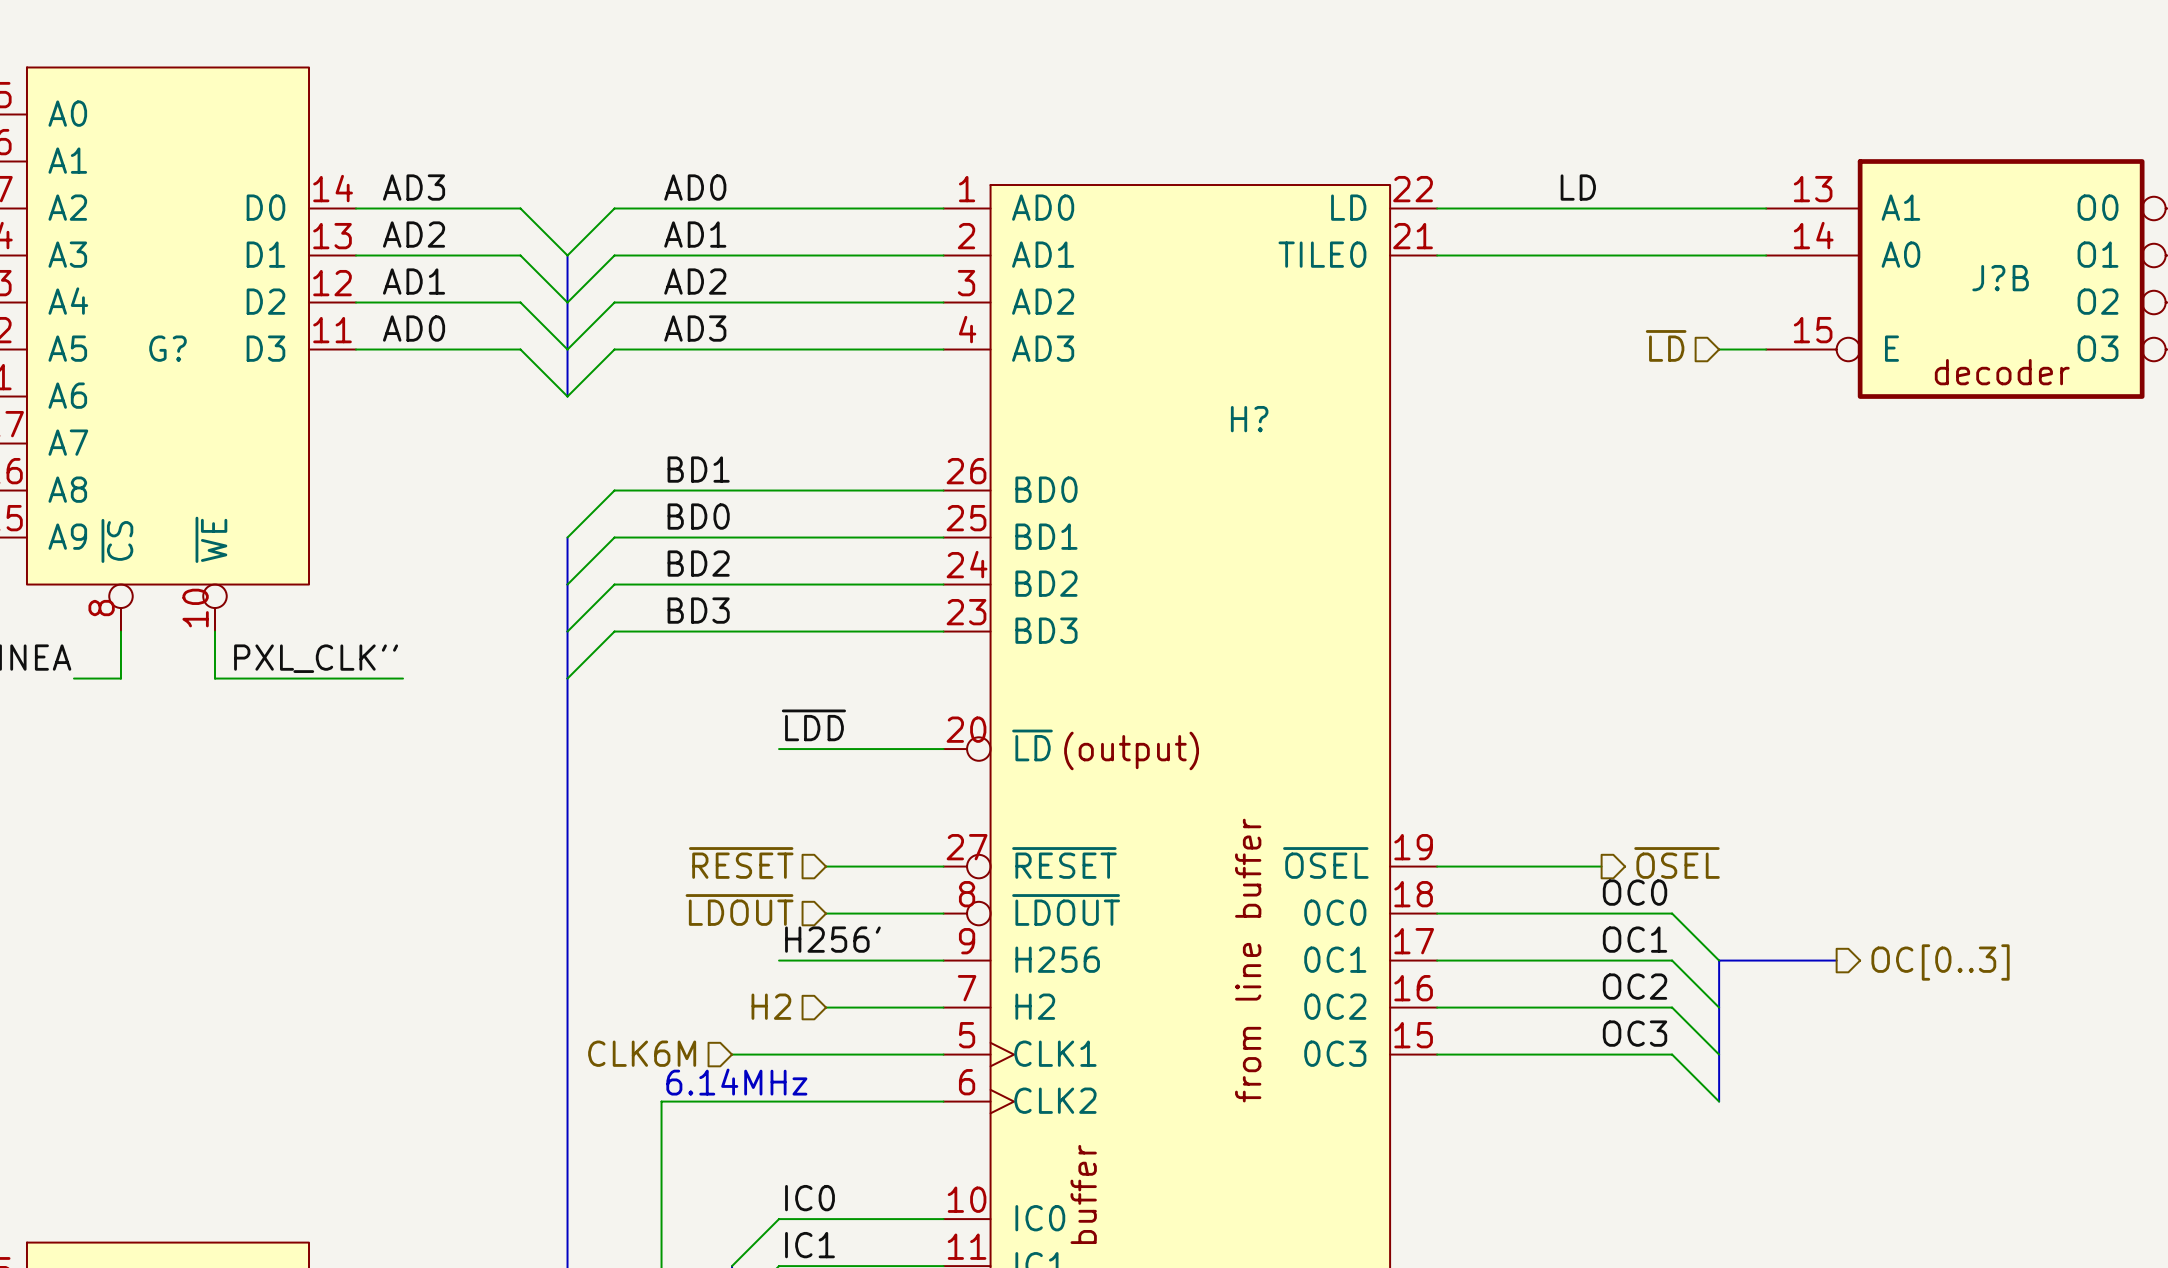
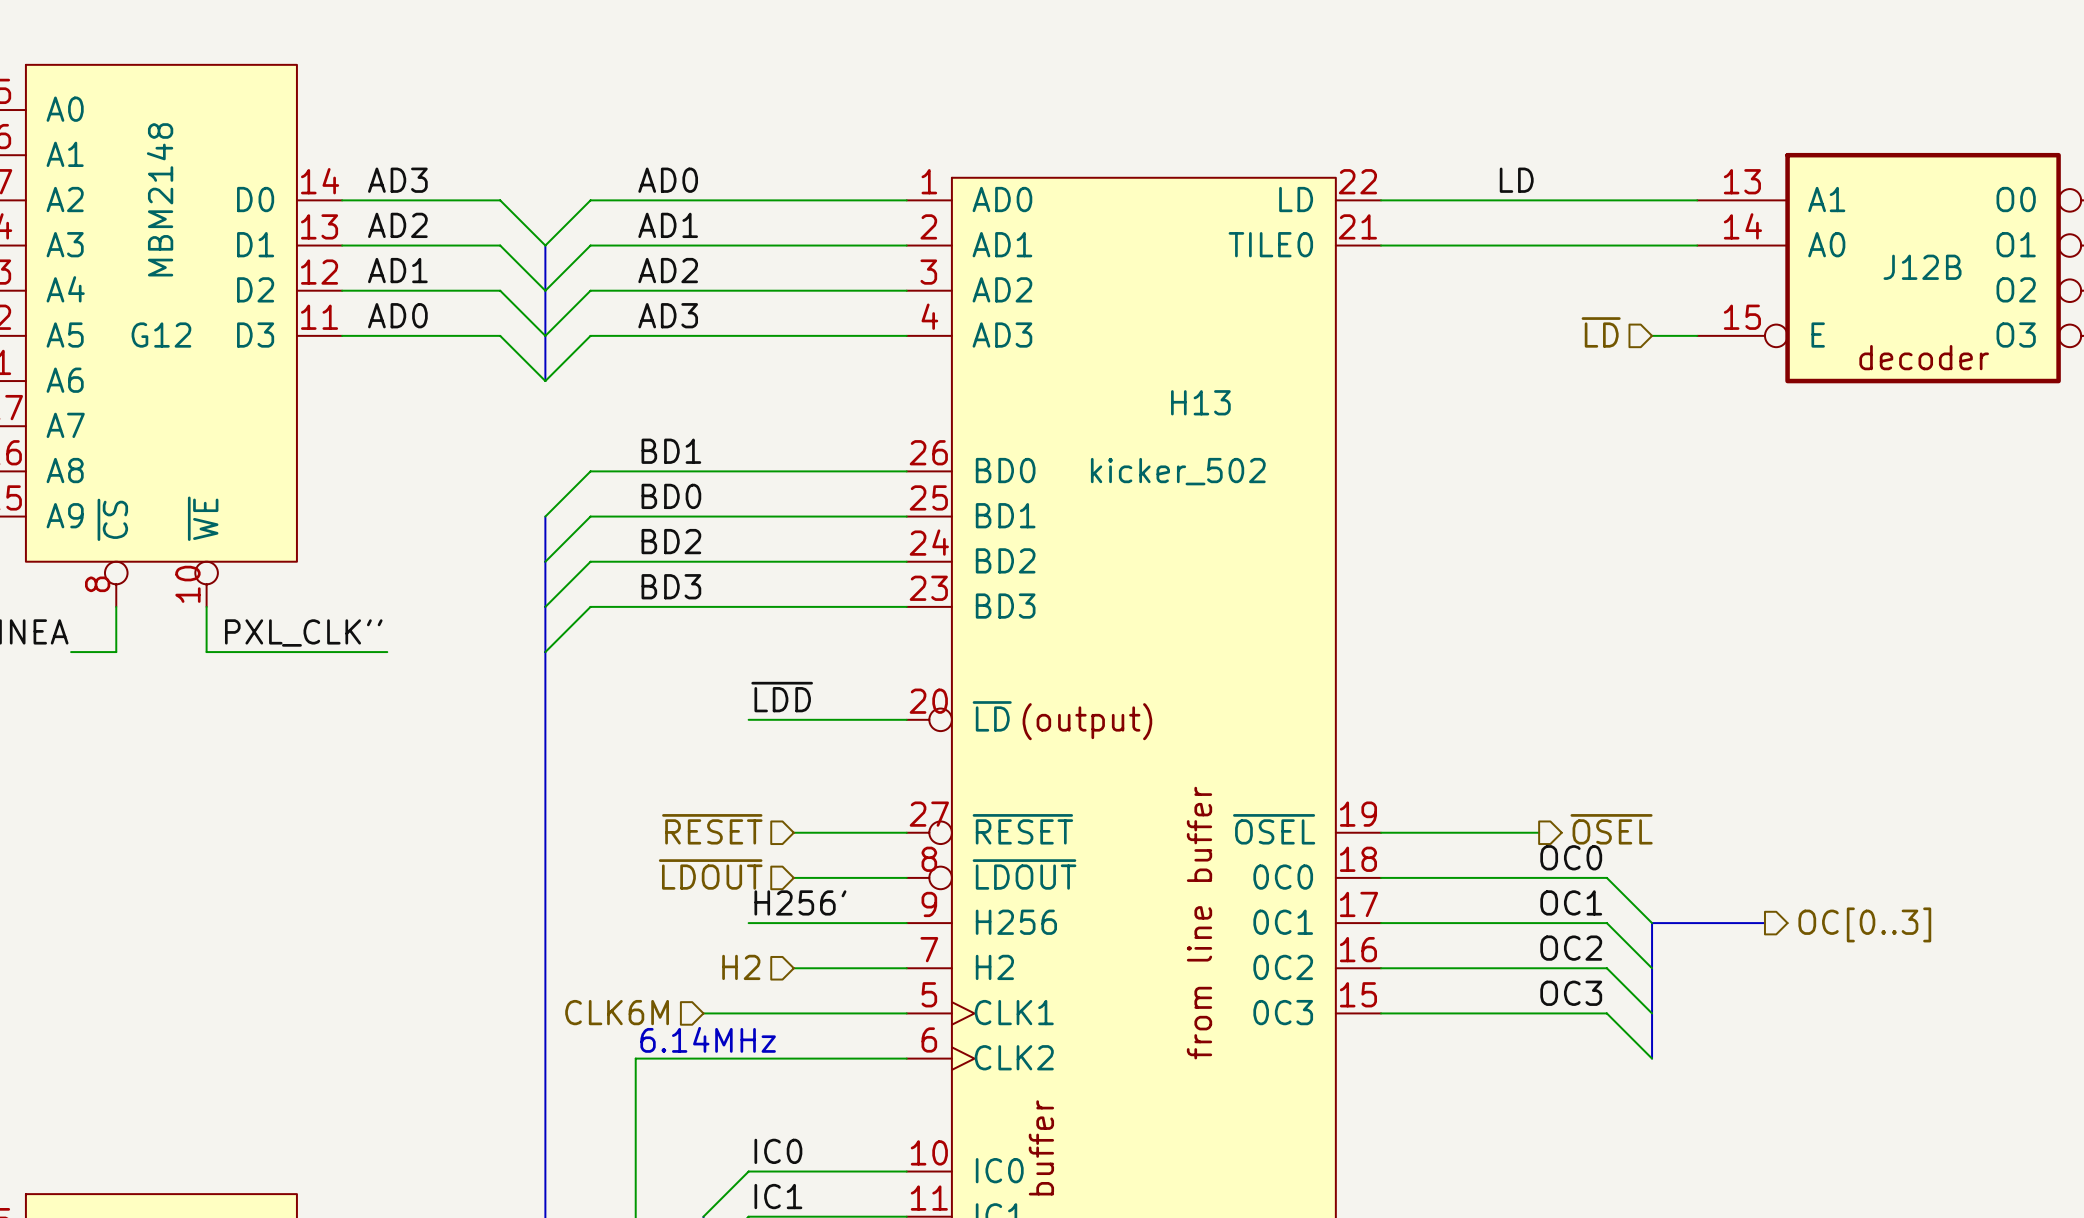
G? value: none -> MBM2148 (160, 199)
J?B name: J?B (2000, 278) -> J12B (1922, 267)
G? name: G? (167, 348) -> G12 (161, 335)
H? name: H? (1249, 419) -> H13 (1200, 402)
H? value: none -> kicker_502 (1178, 471)

